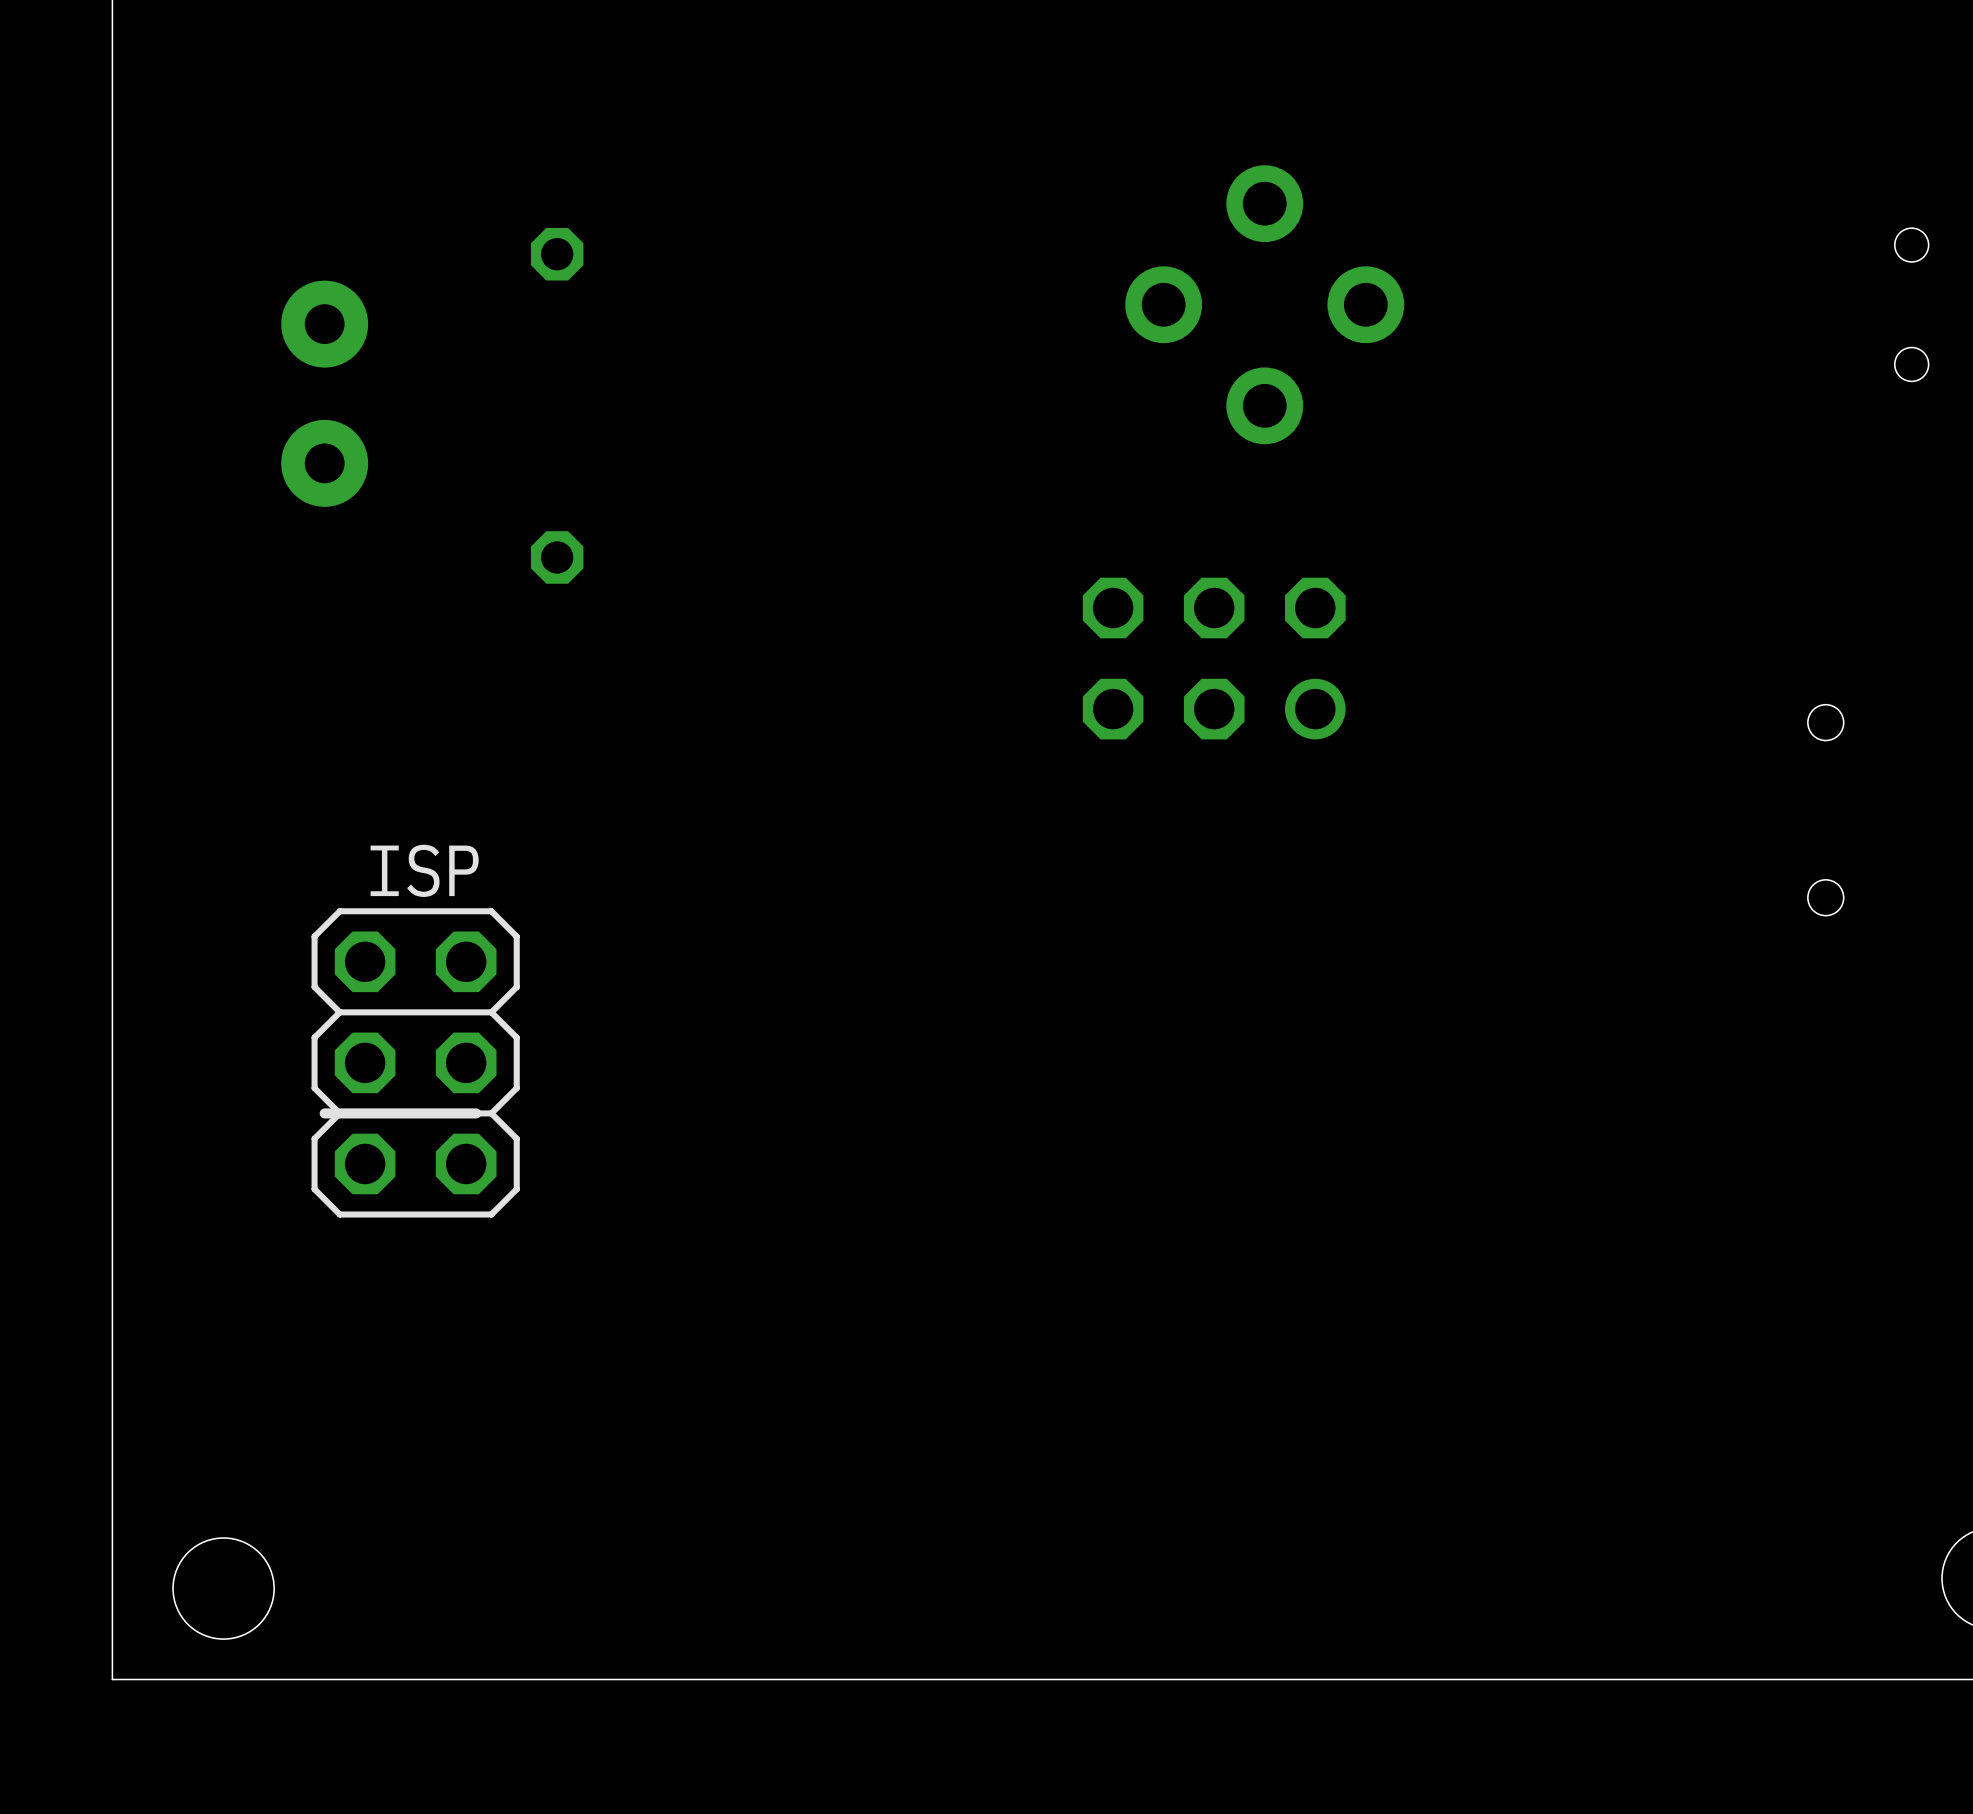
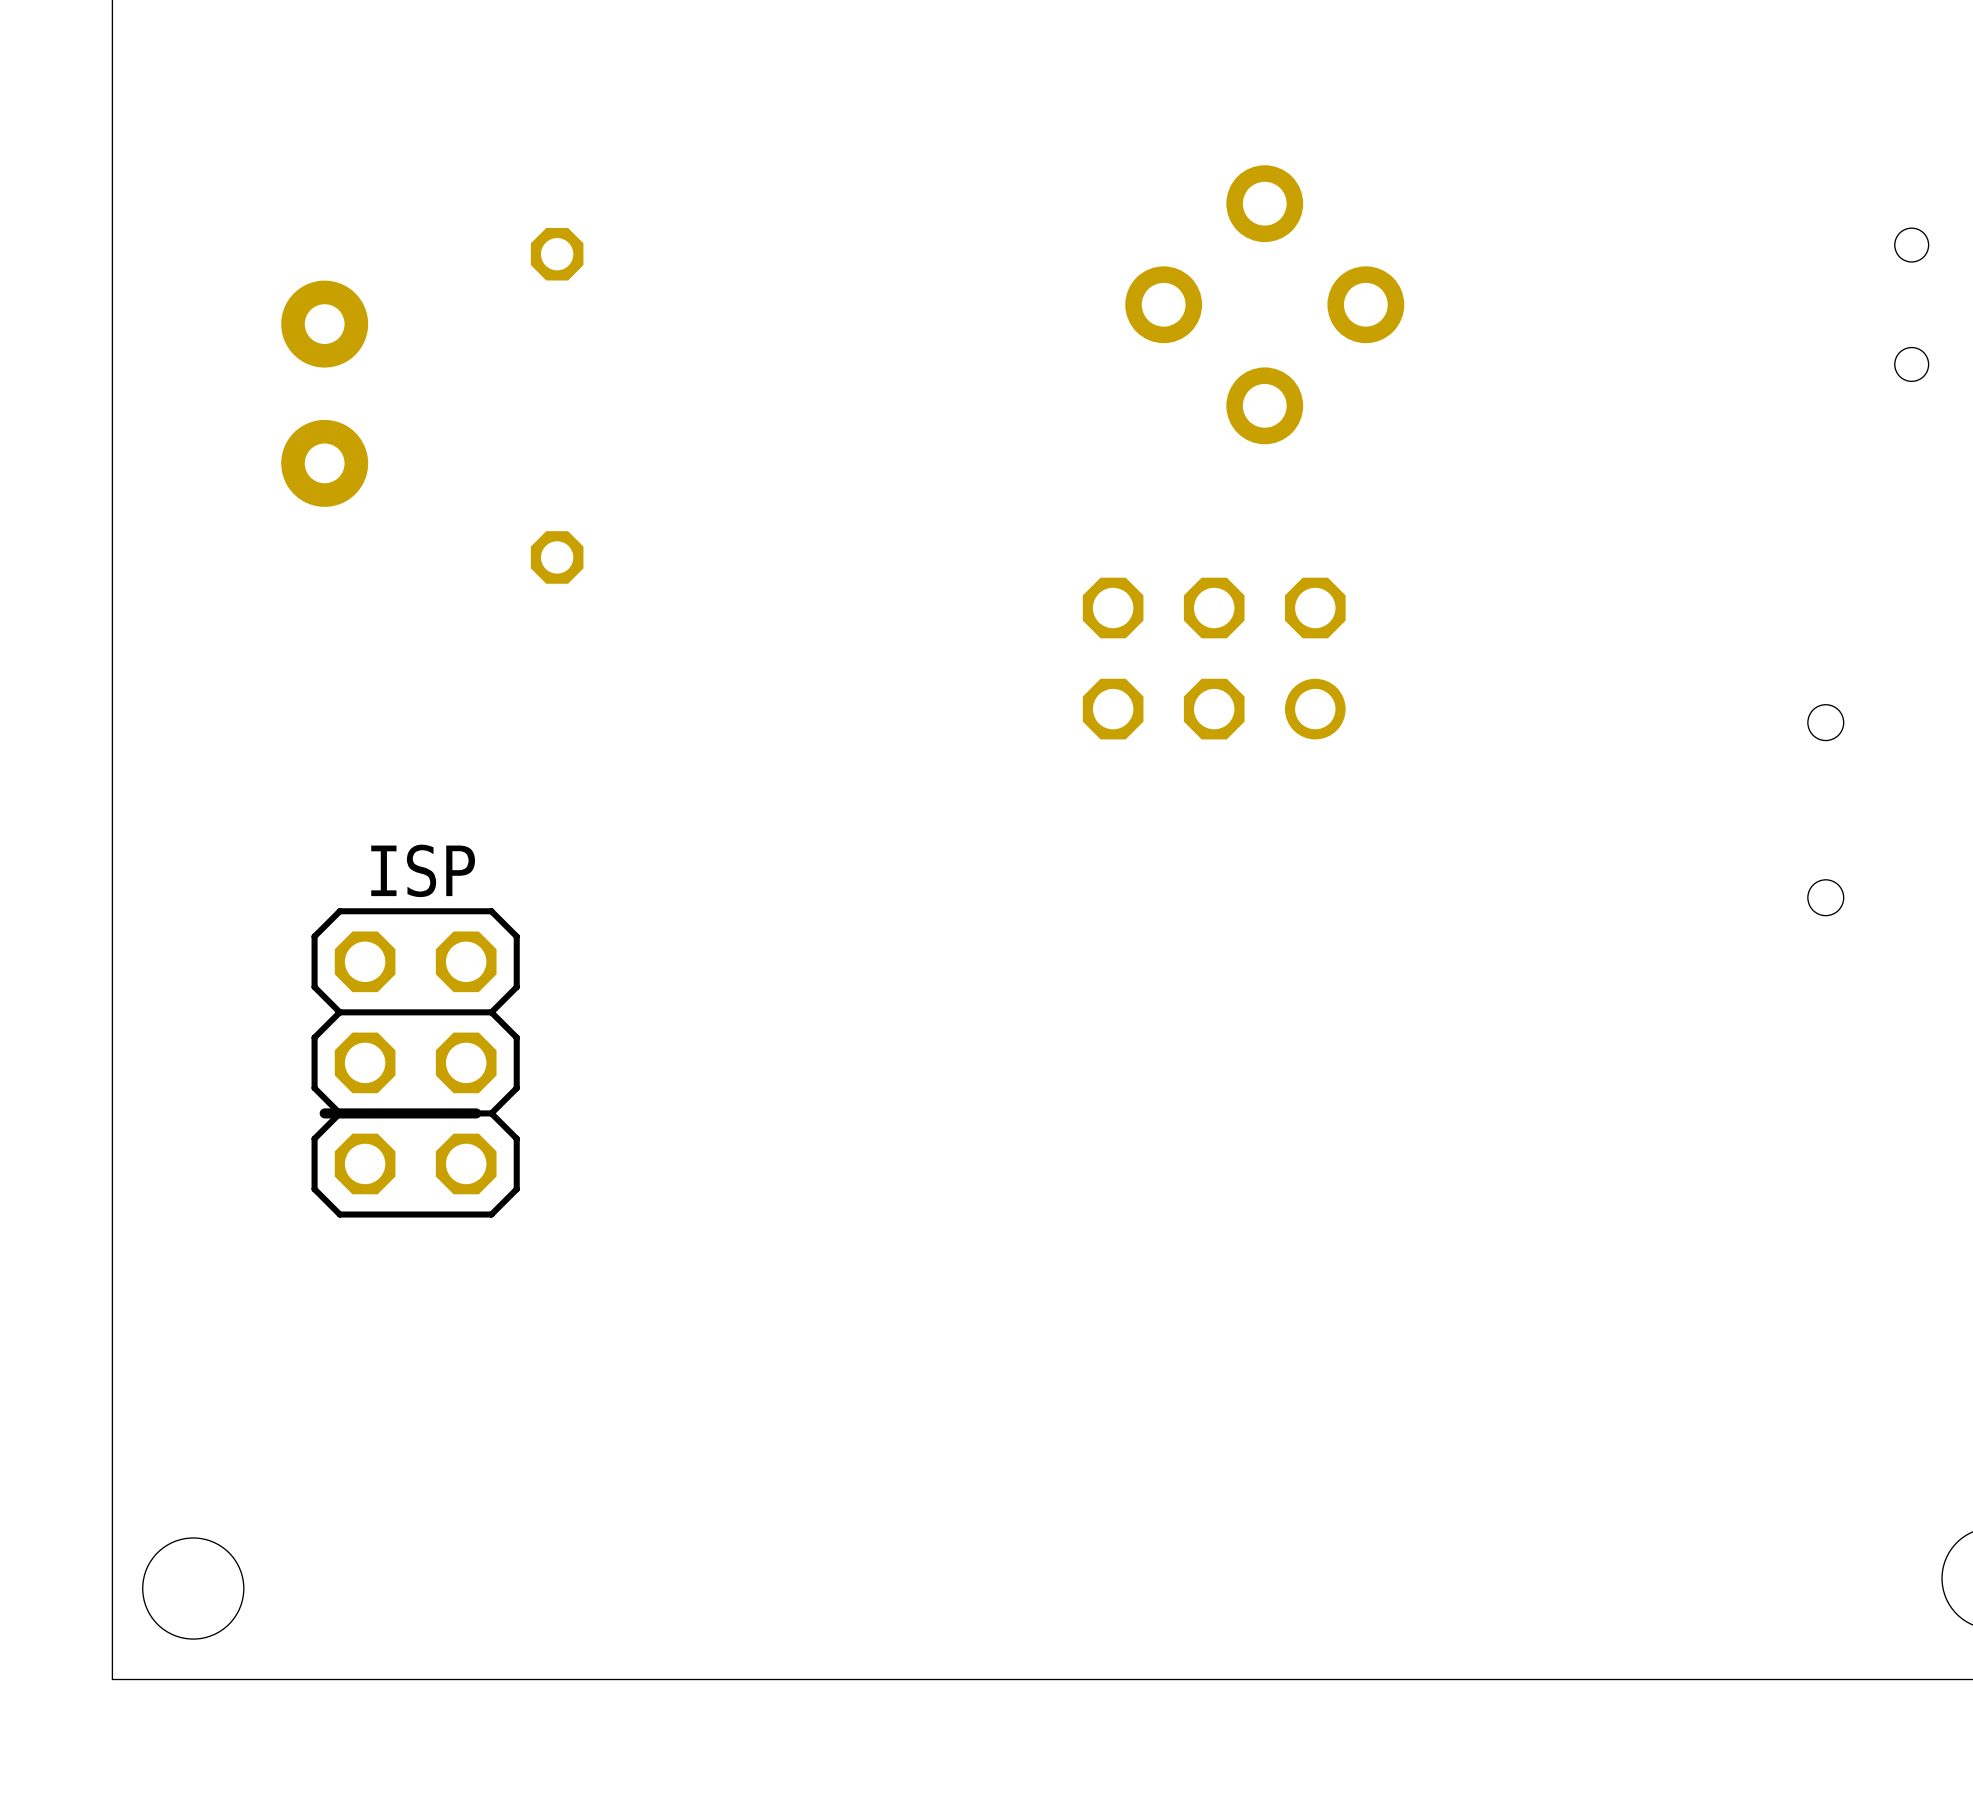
round board edge position: (223, 1588) -> (193, 1588)

